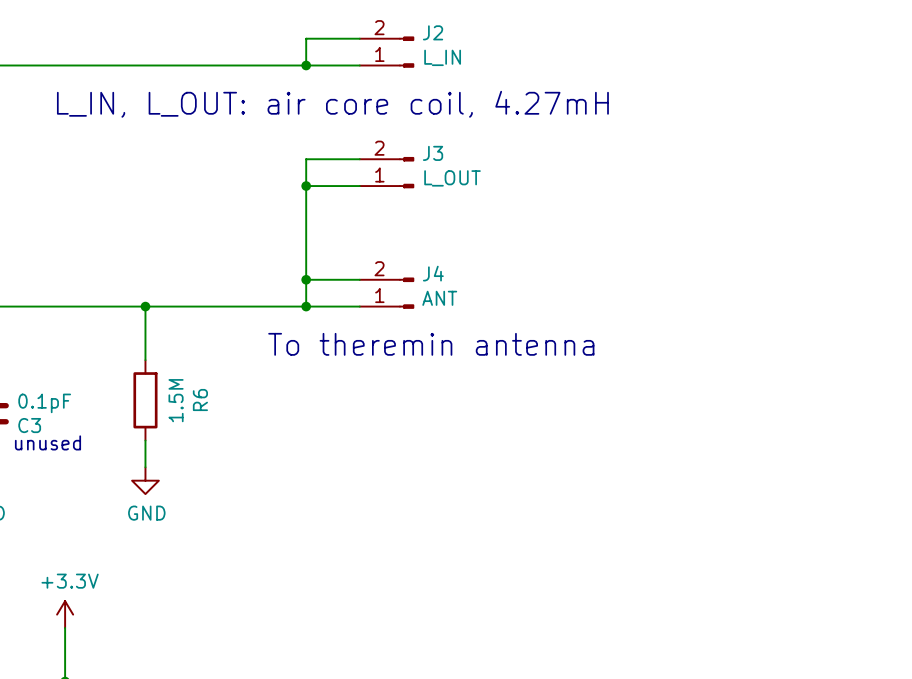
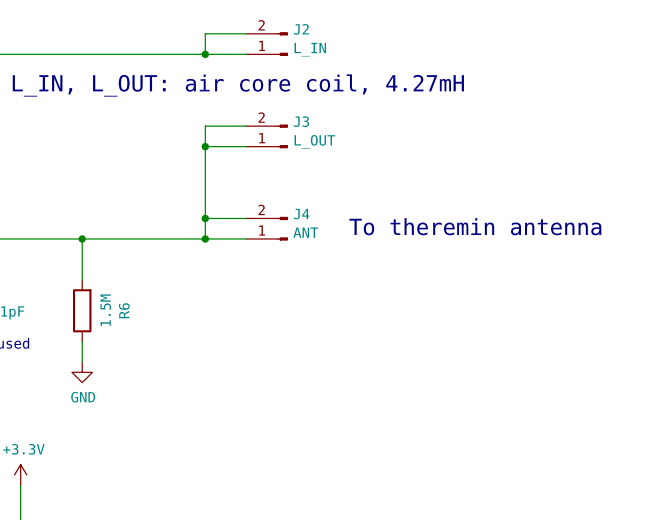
text position: To theremin antenna (431, 344) -> To theremin antenna (475, 226)

